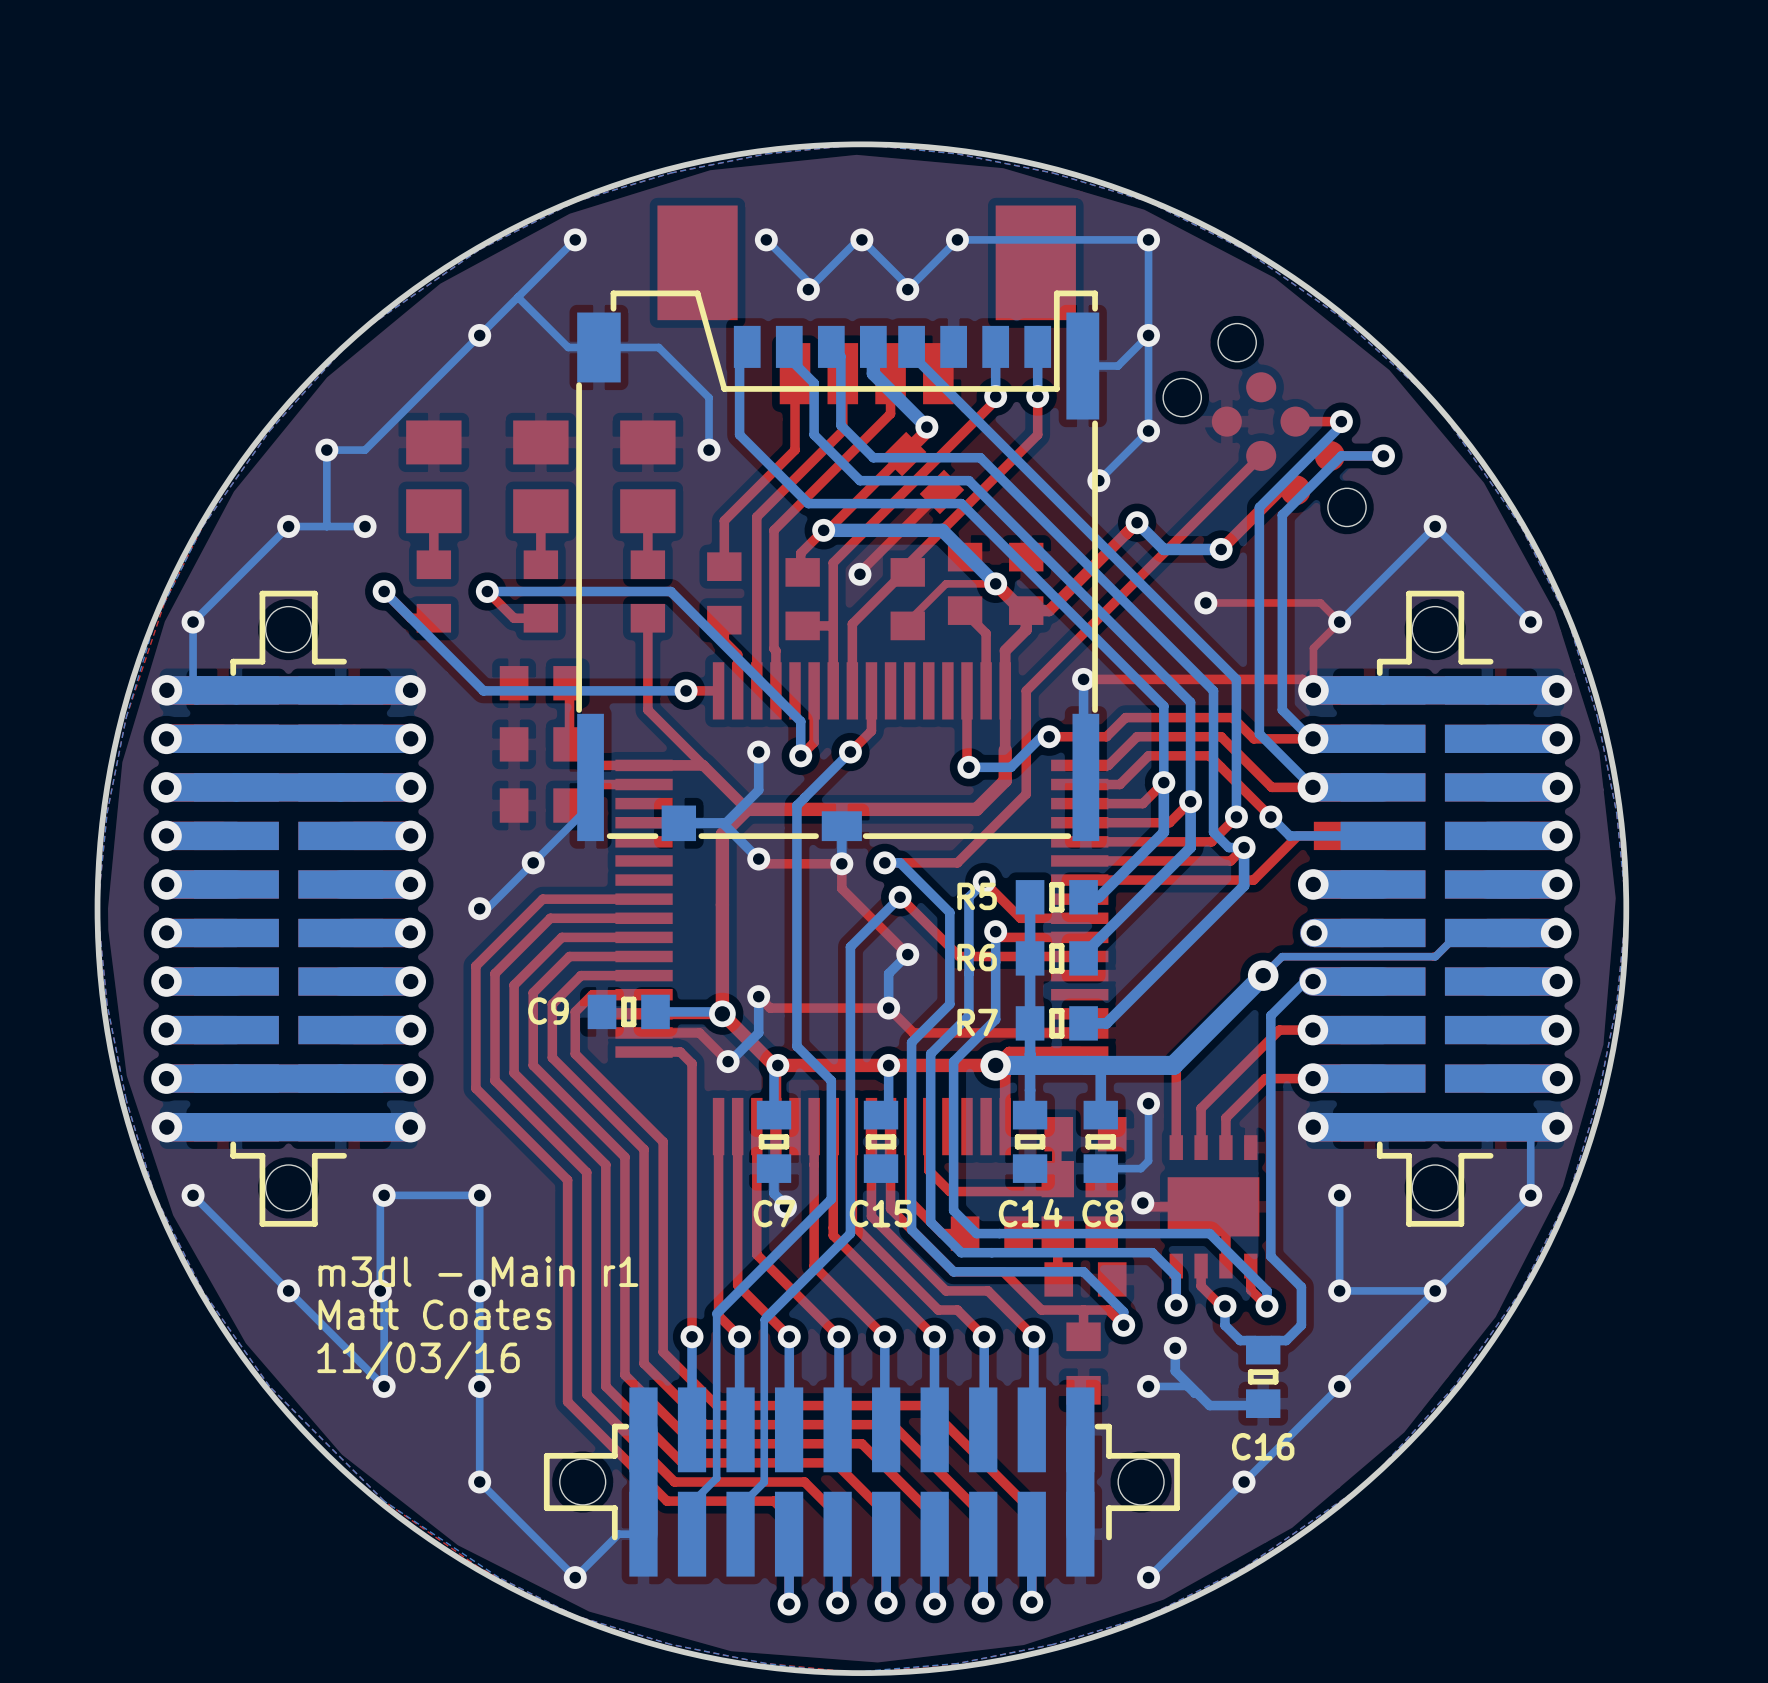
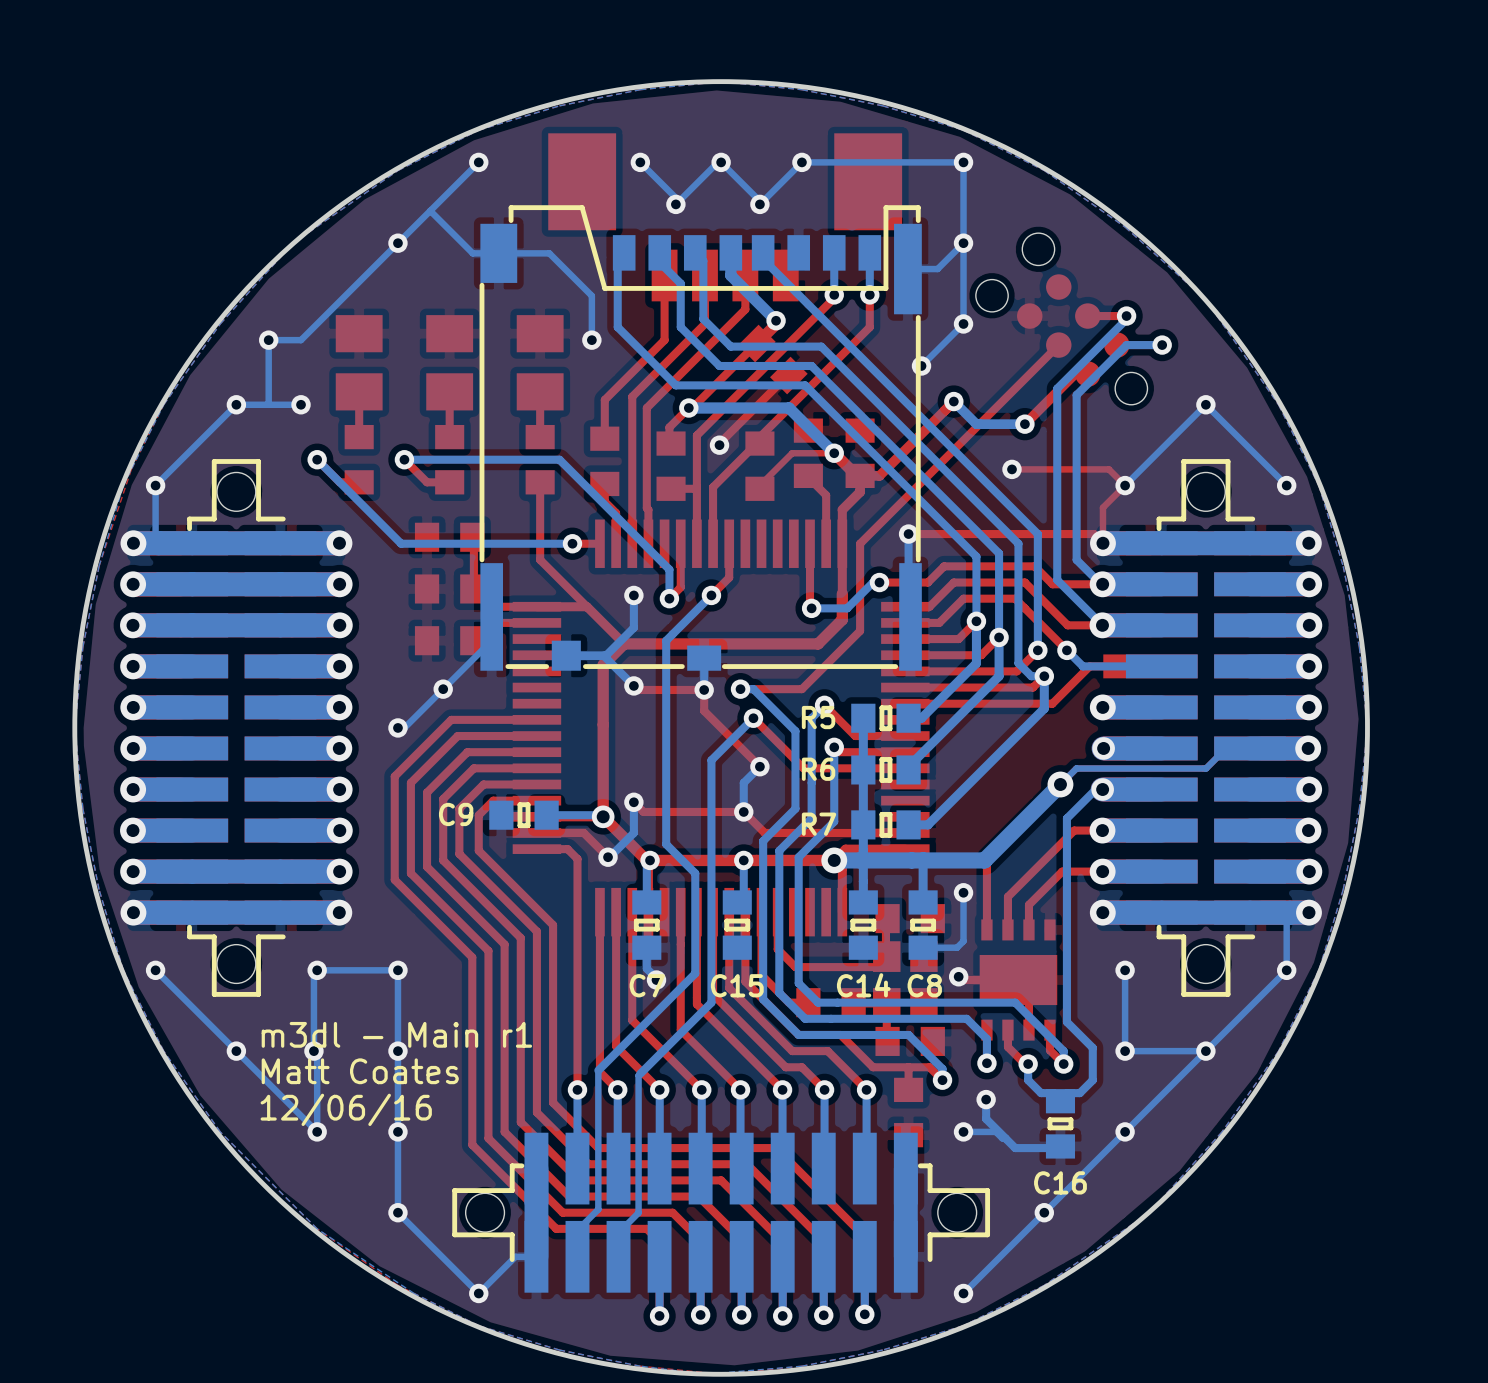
text: 11/03/16 (418, 1360) -> 12/06/16 (346, 1109)

